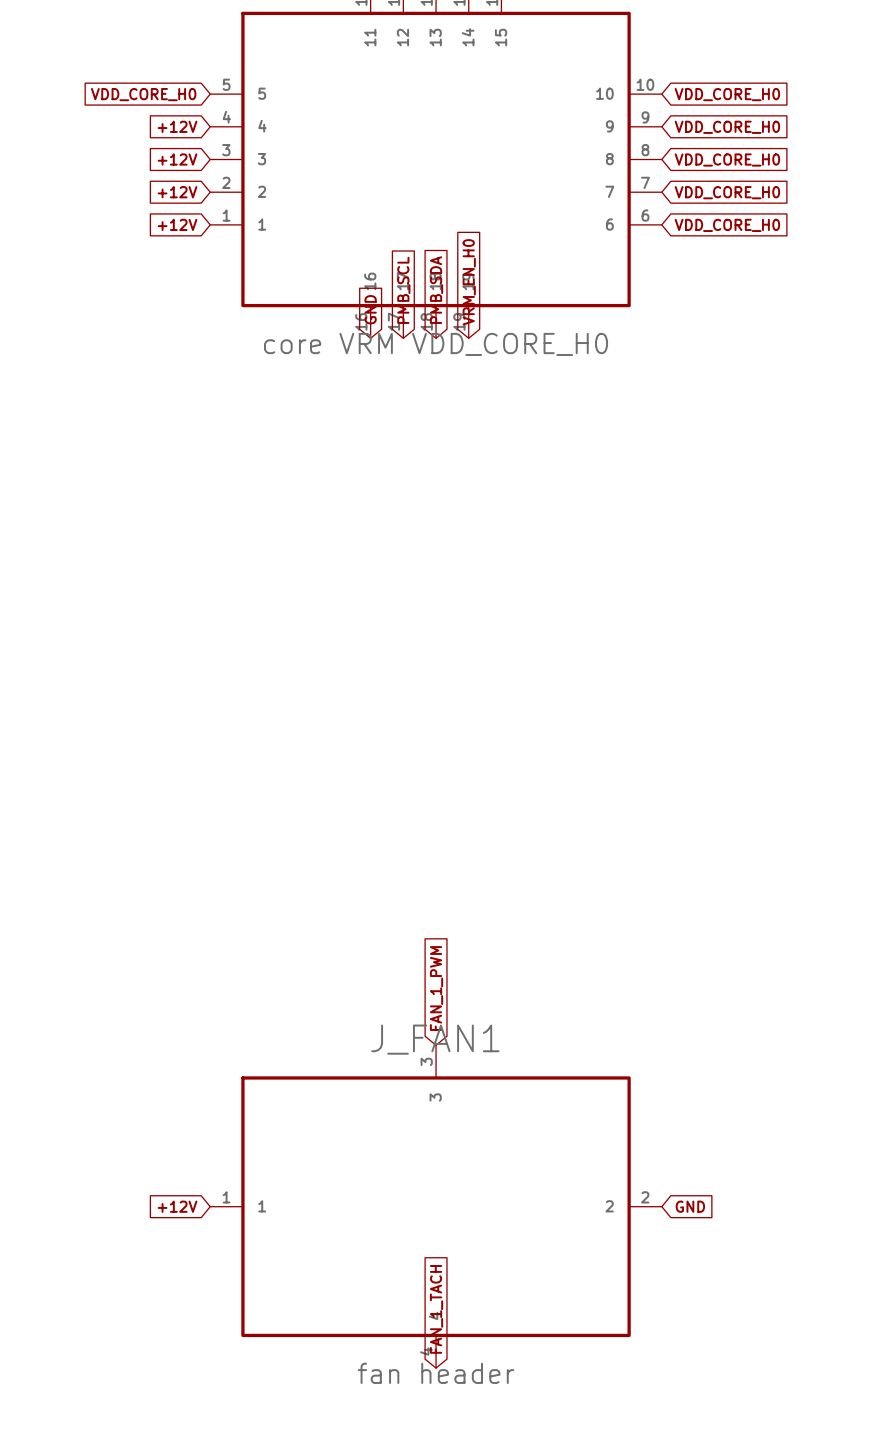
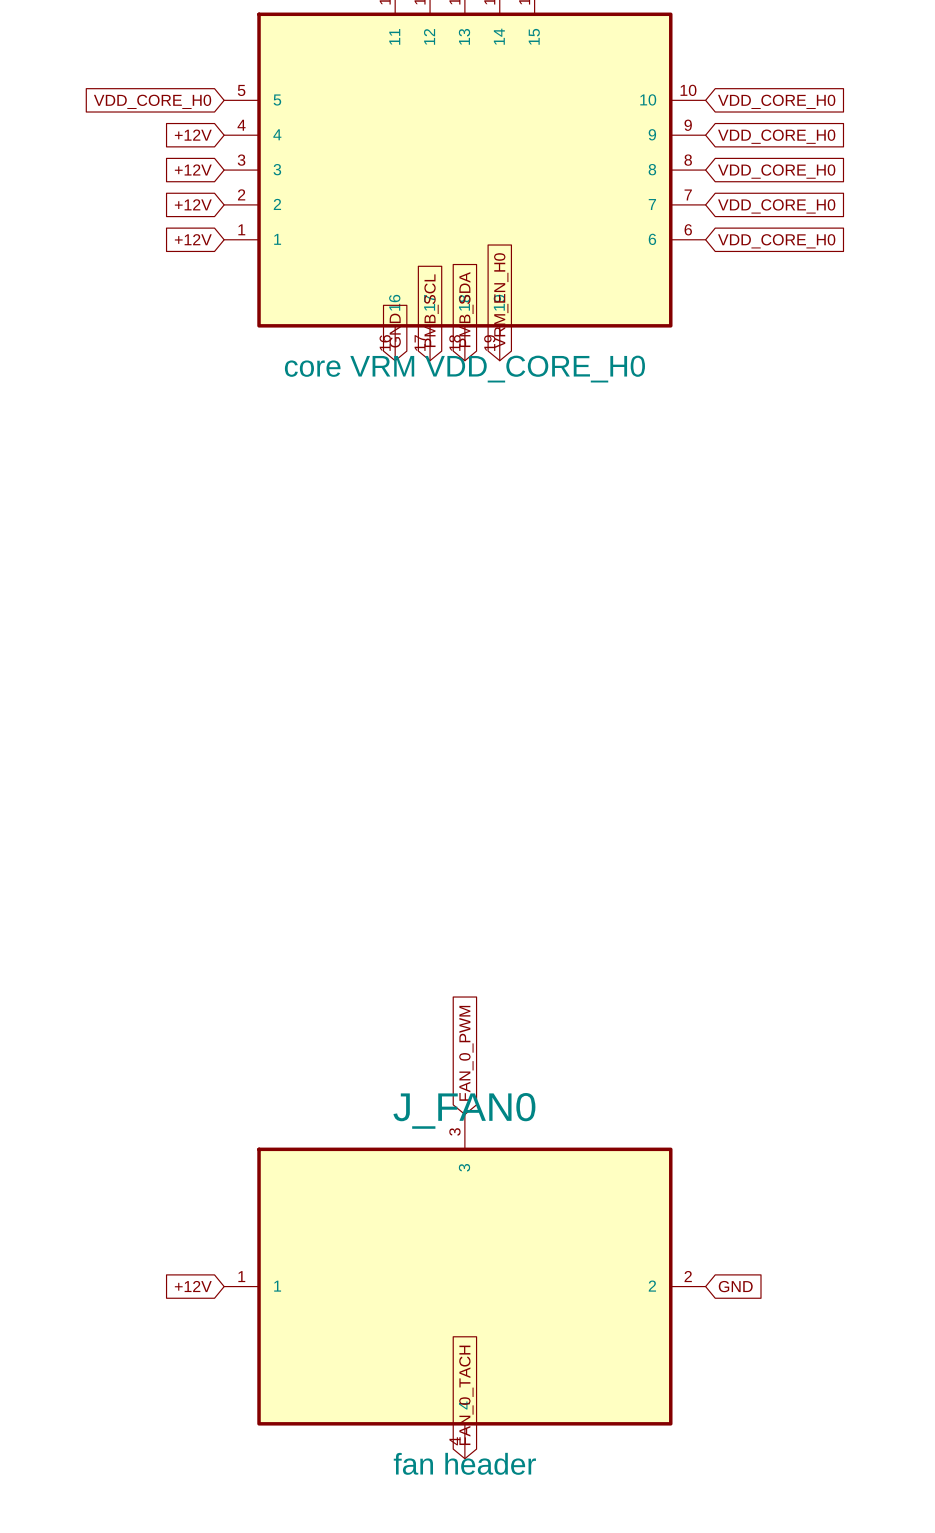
global label: FAN_1_PWM (436, 988) -> FAN_0_PWM (466, 1053)
J_FAN1 name: J_FAN1 (435, 1039) -> J_FAN0 (464, 1110)
global label: FAN_1_TACH (436, 1309) -> FAN_0_TACH (466, 1395)

